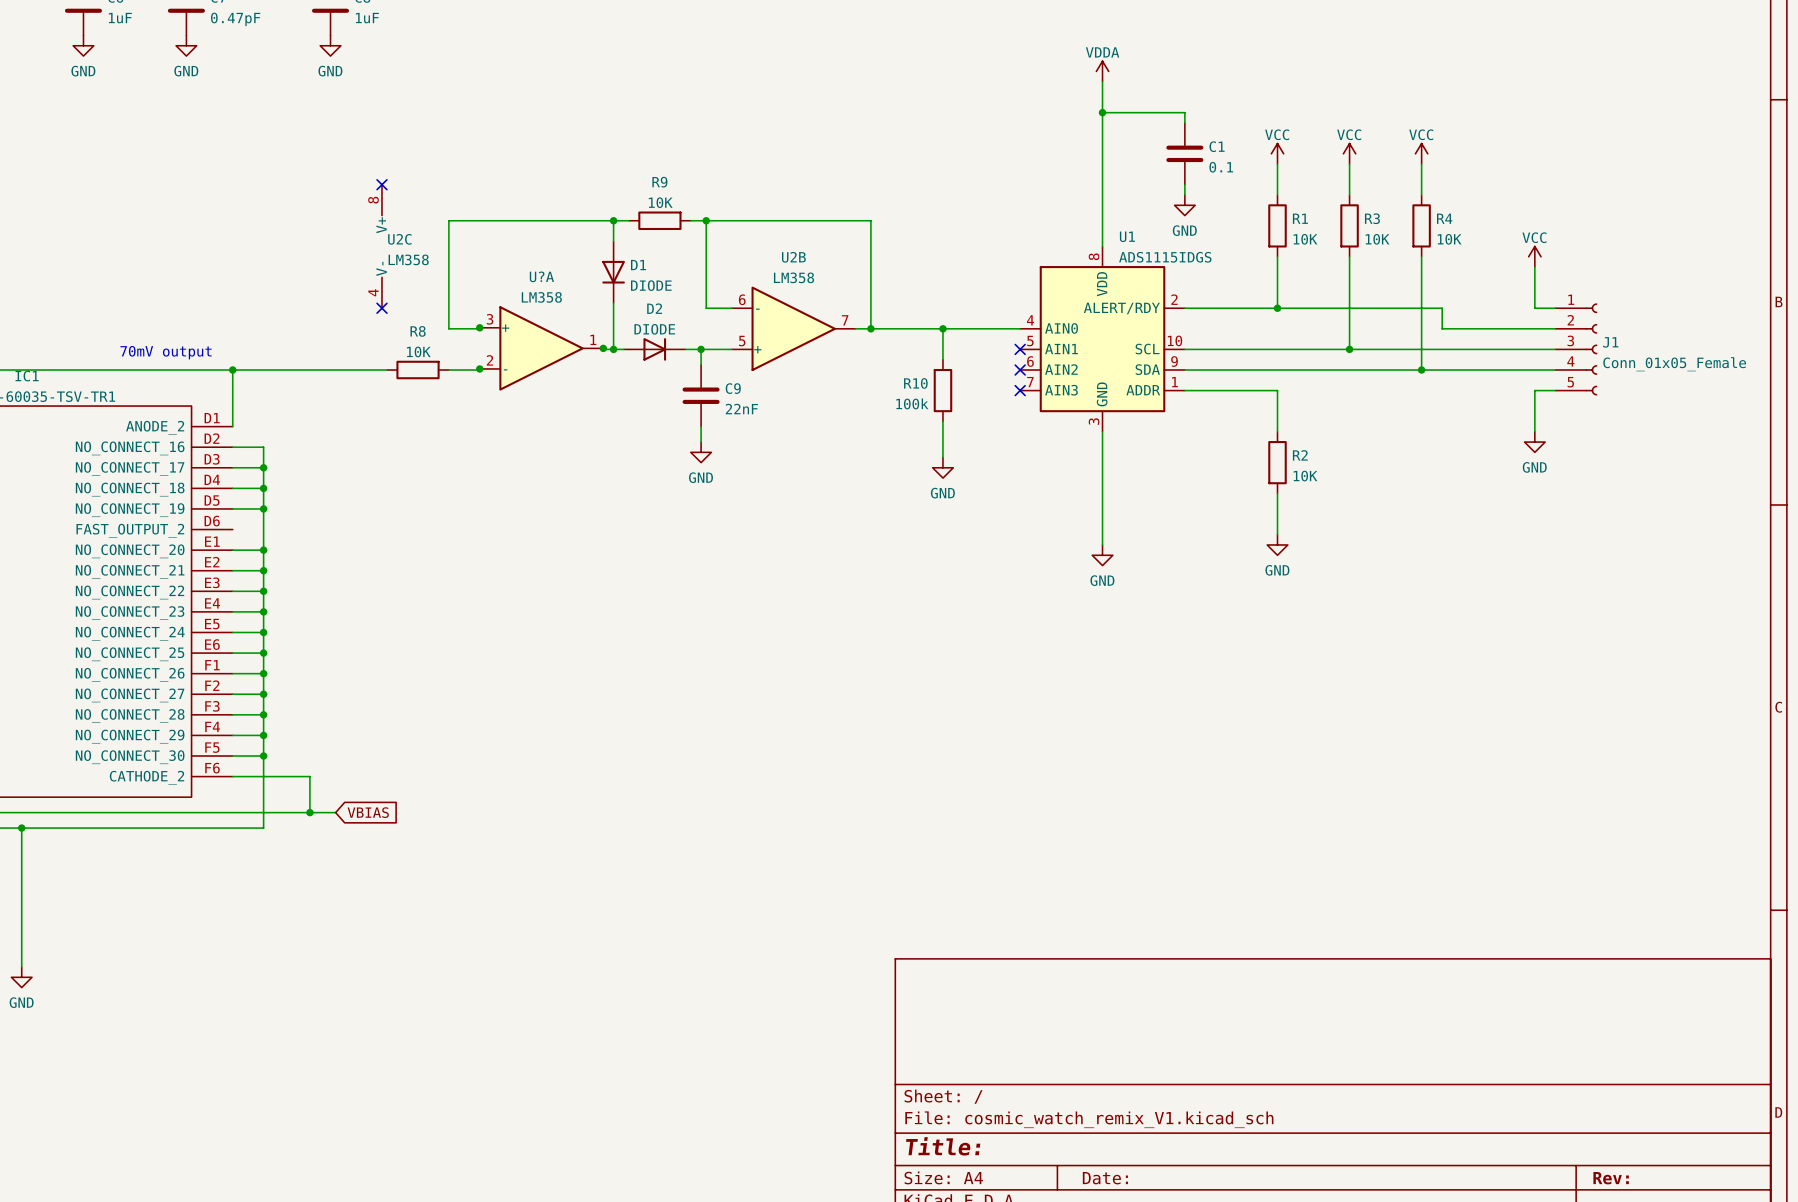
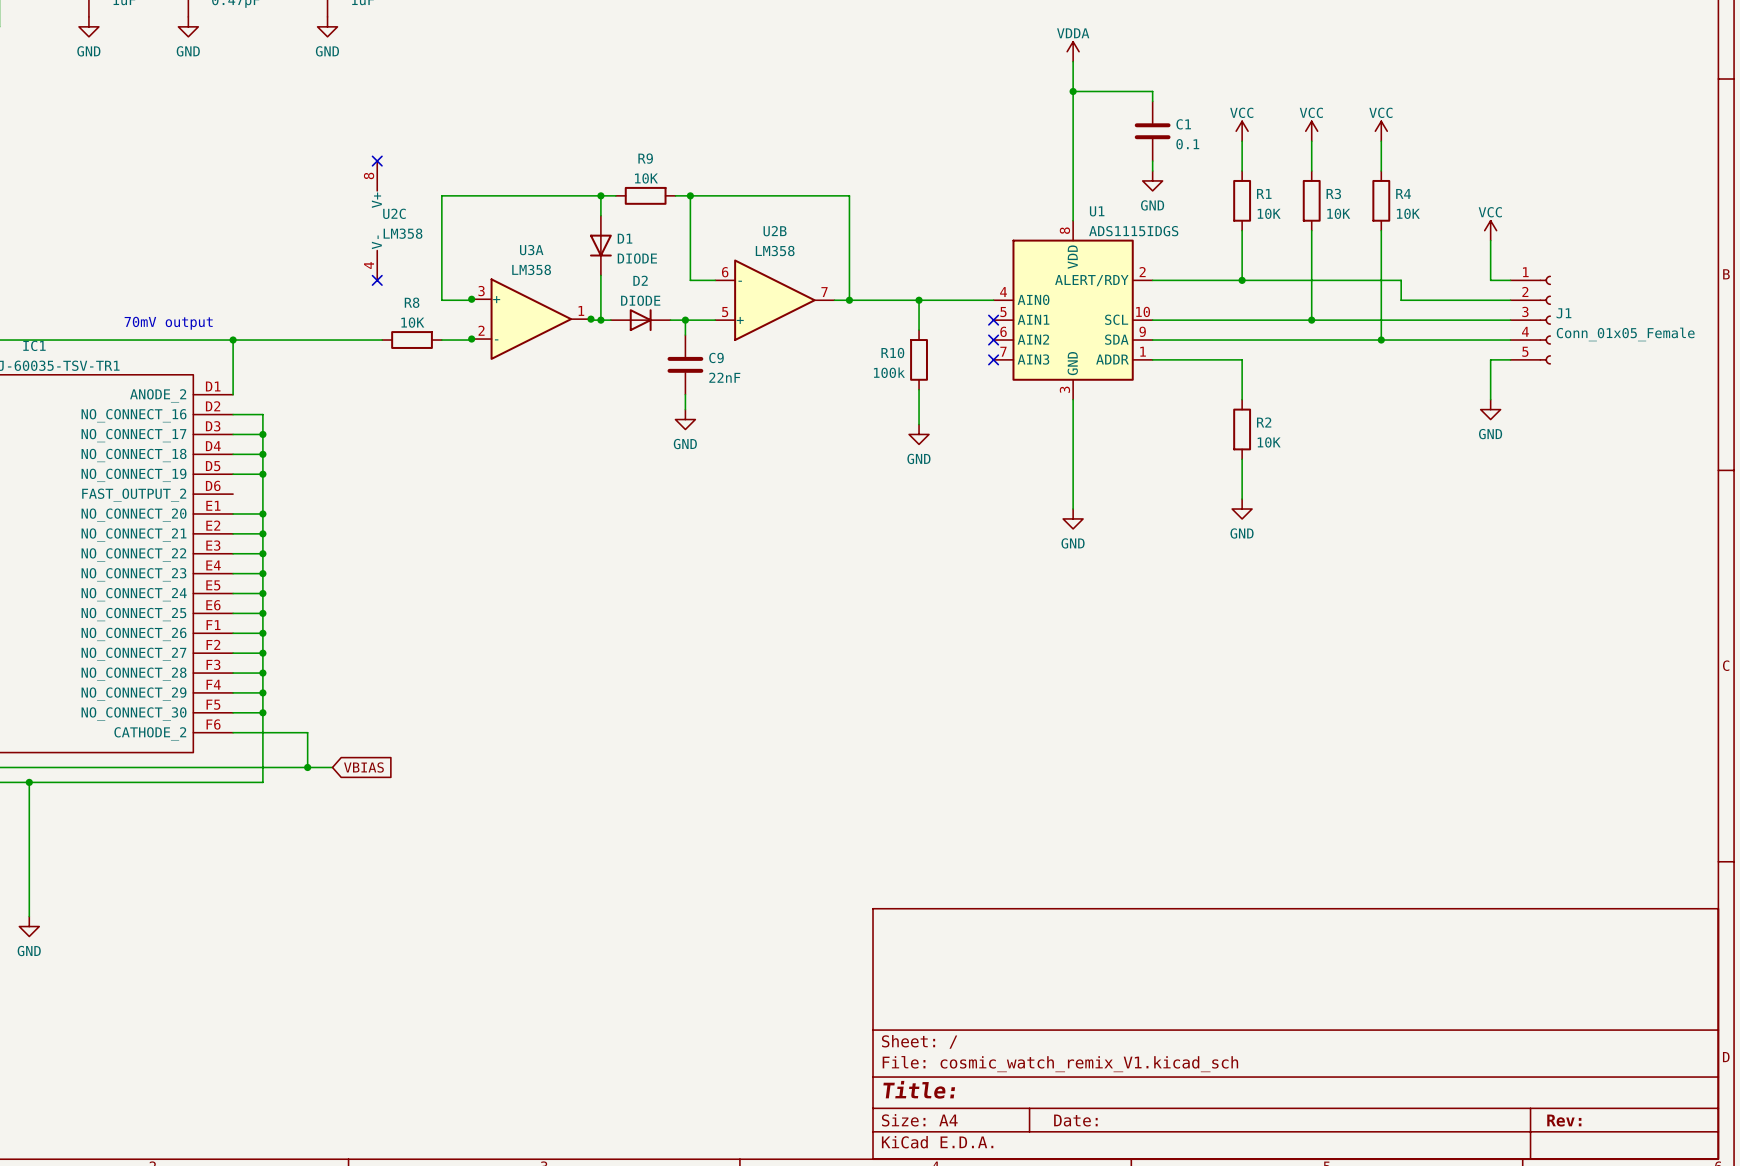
U?A name: U?A (541, 276) -> U3A (531, 250)

